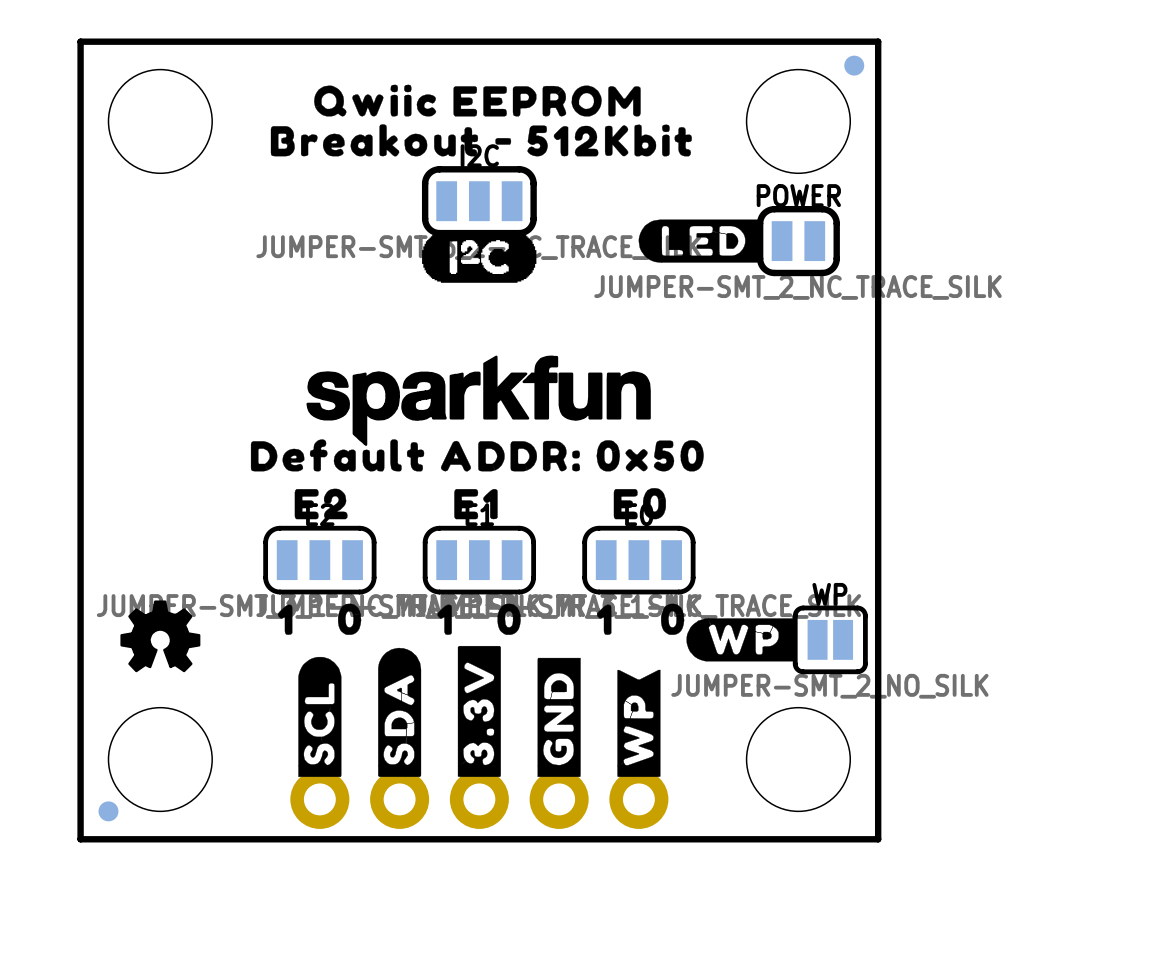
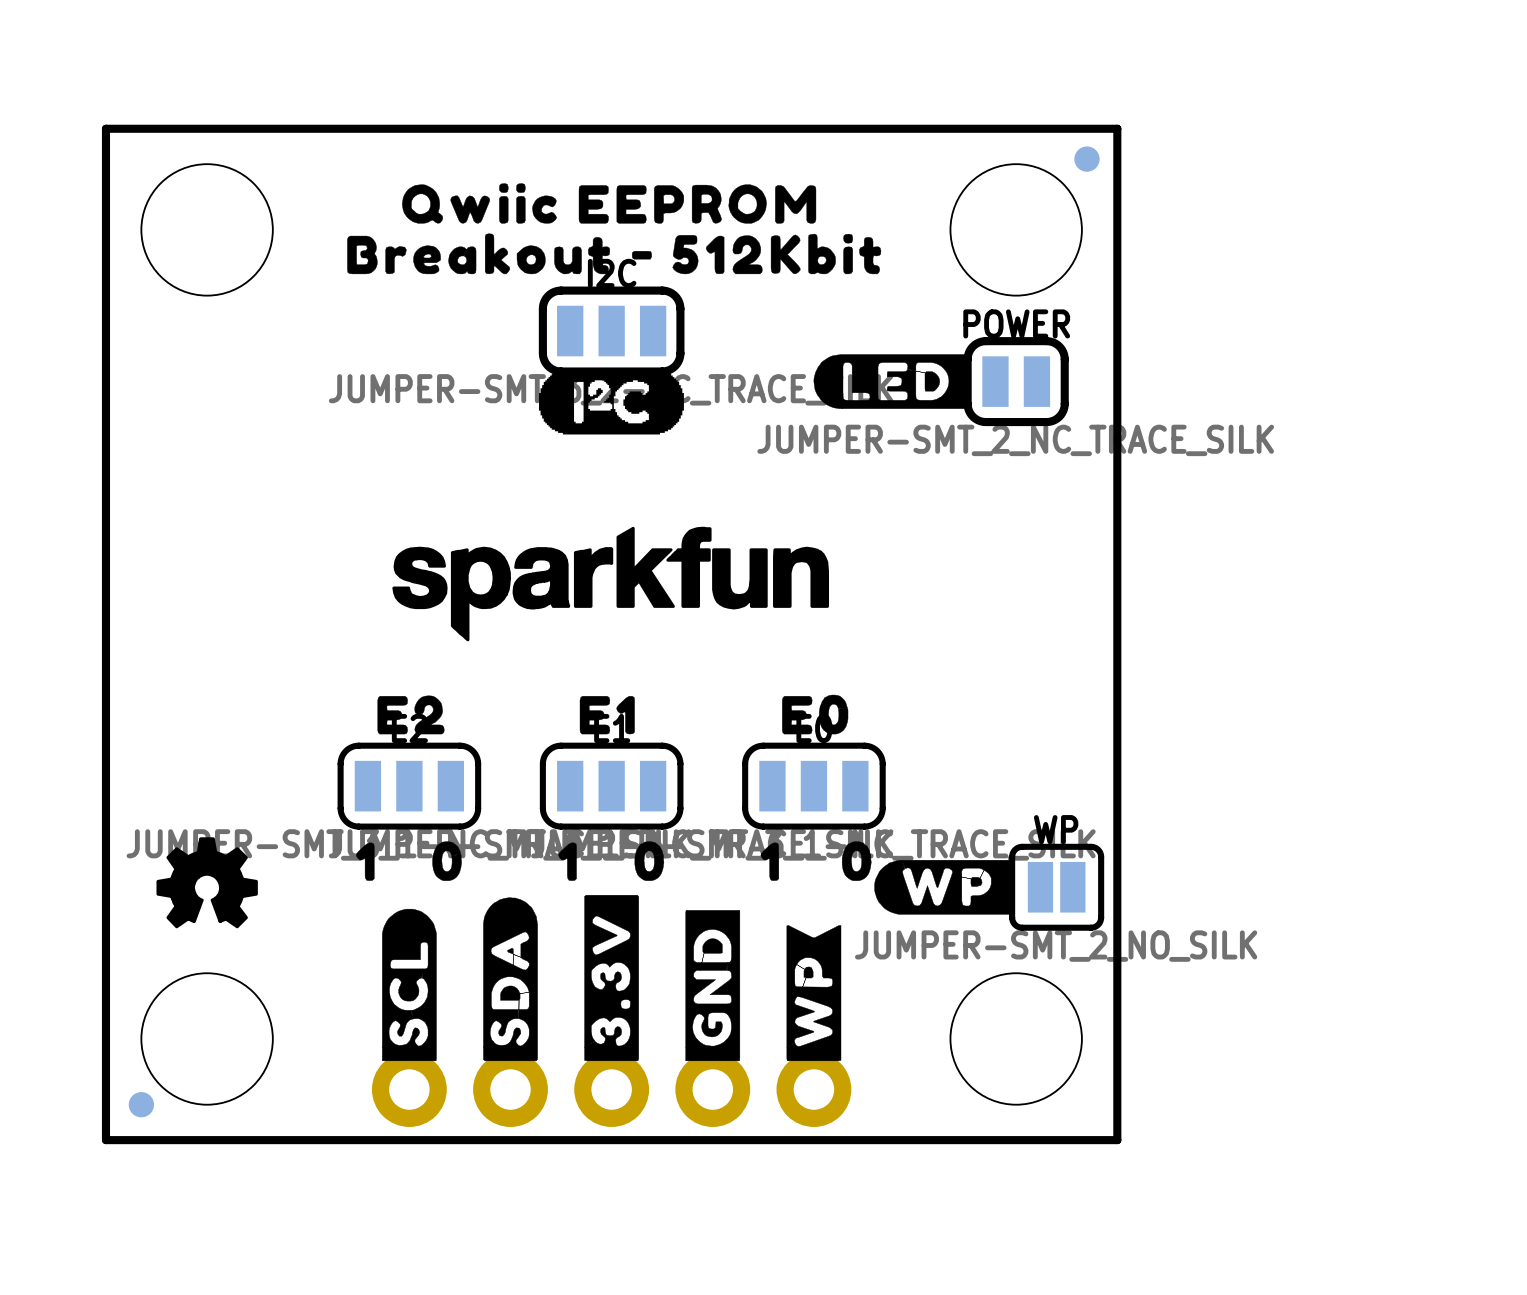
drawing: [250, 439, 704, 472] -> none

